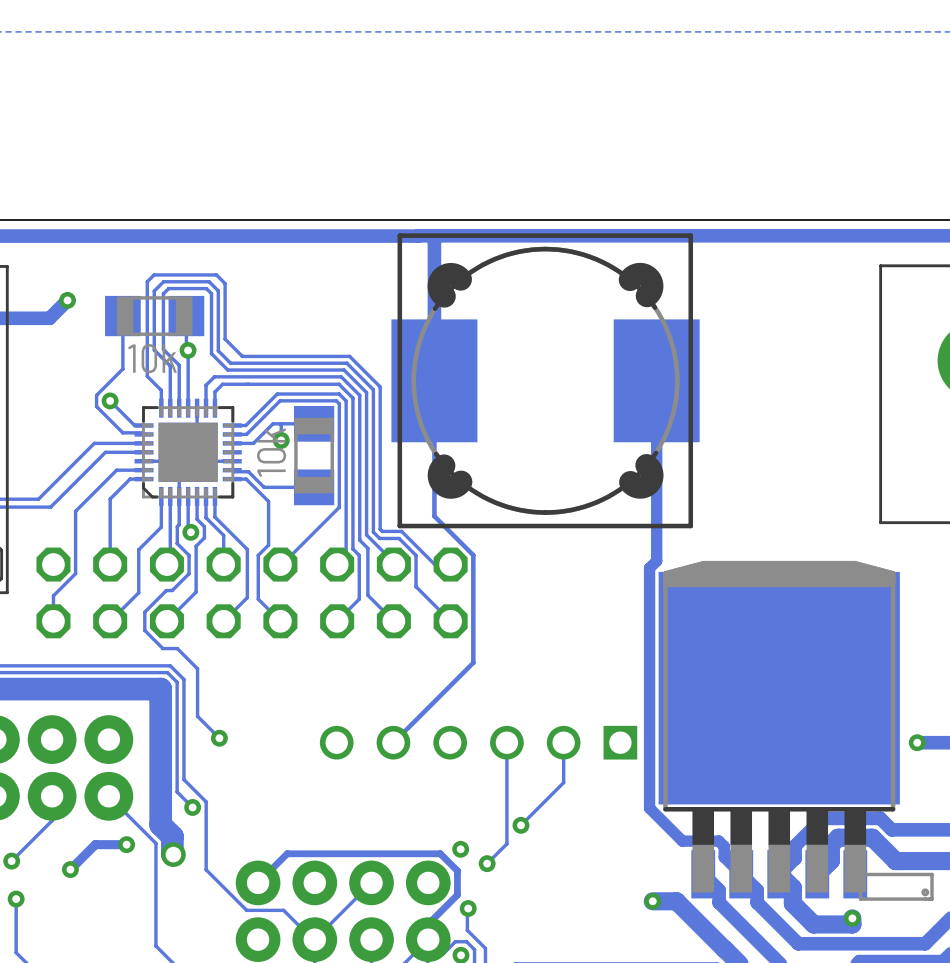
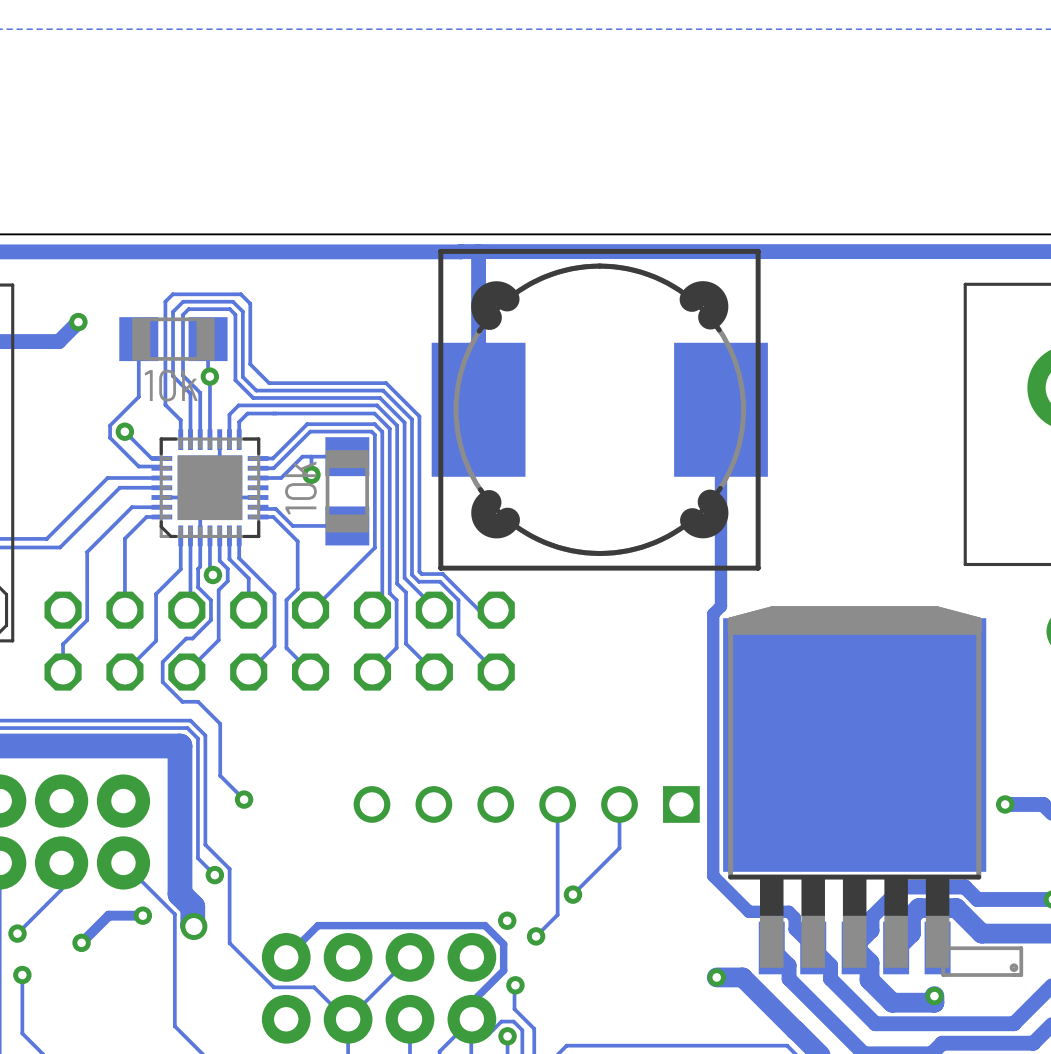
track: (434, 380) (434, 516) (473, 555) (473, 662) (393, 742) -> none

